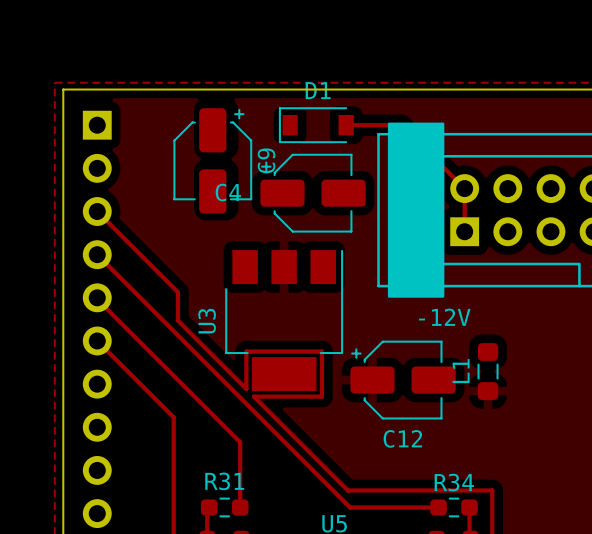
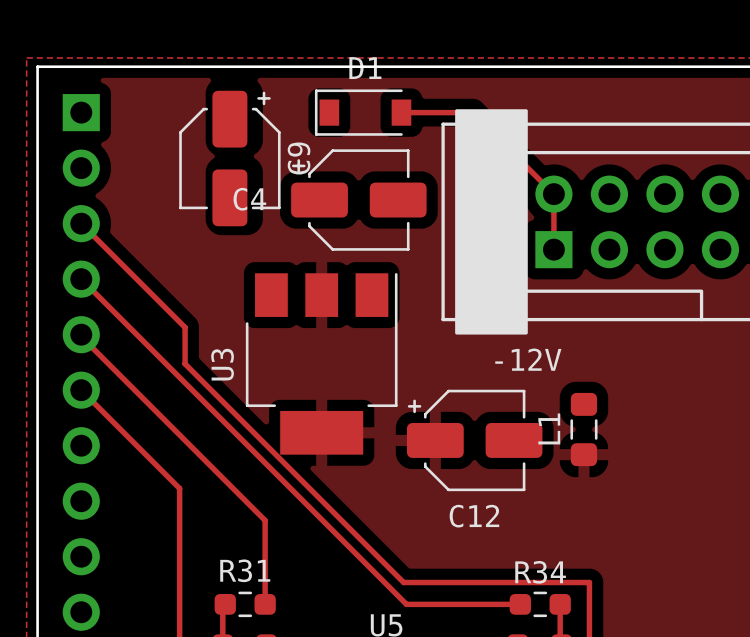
track: (246, 388) (246, 351) (321, 351) (321, 396) (253, 396) -> (273, 451) (282, 461)

